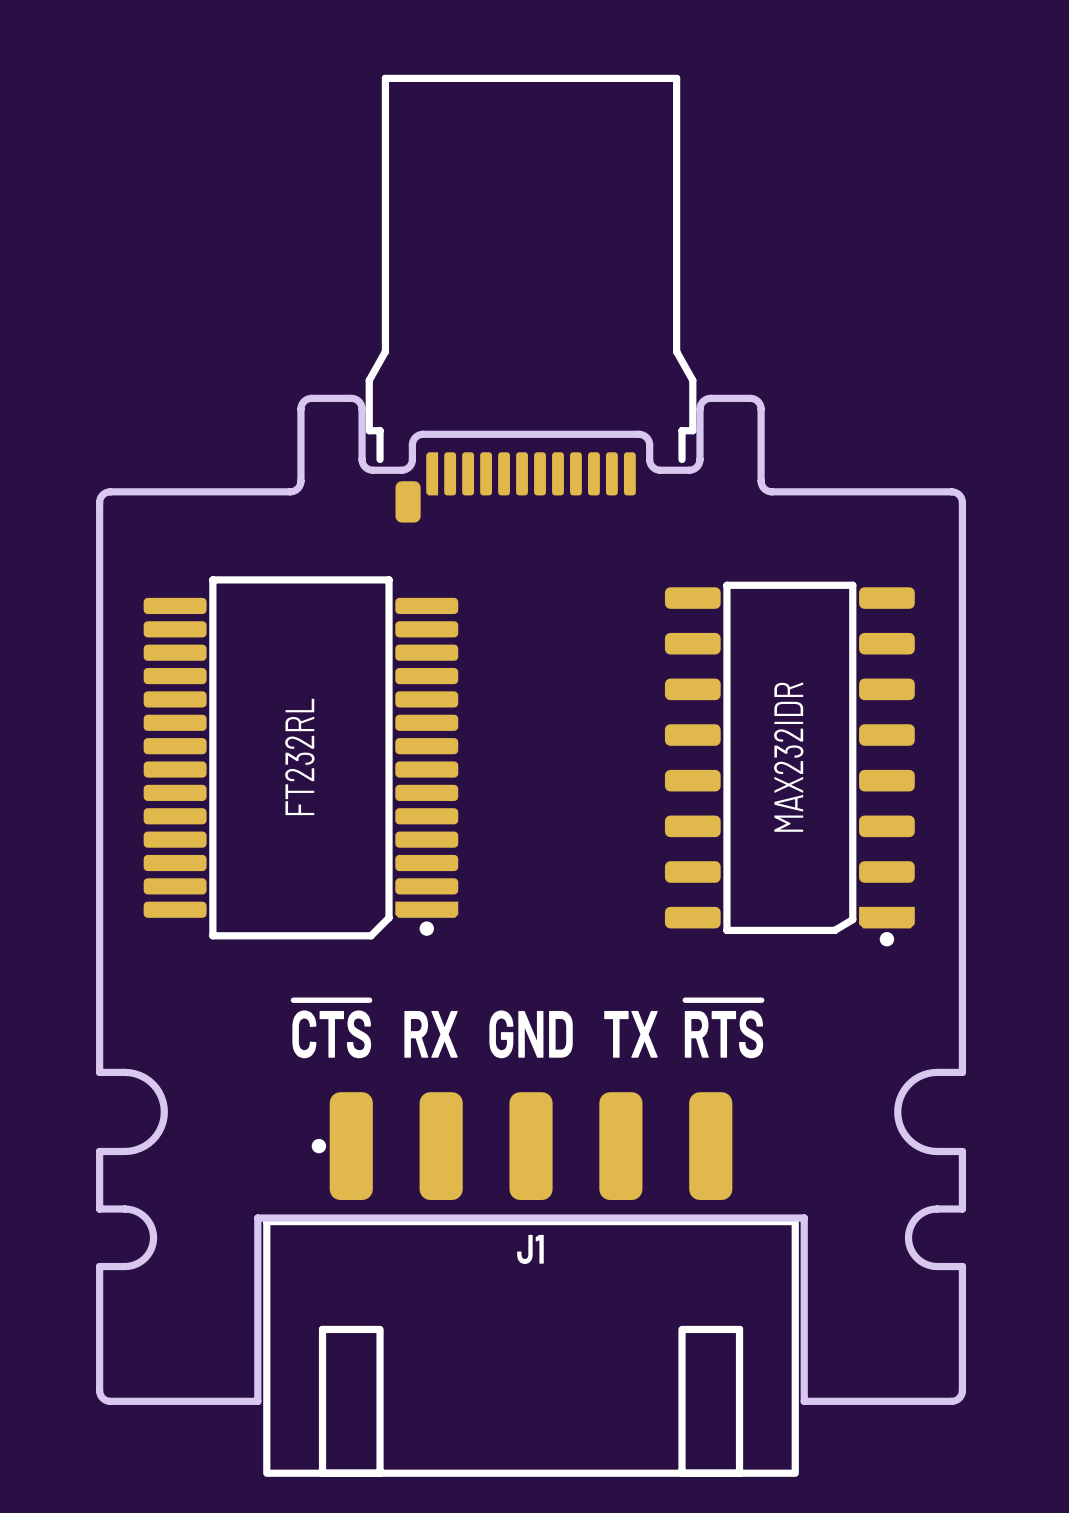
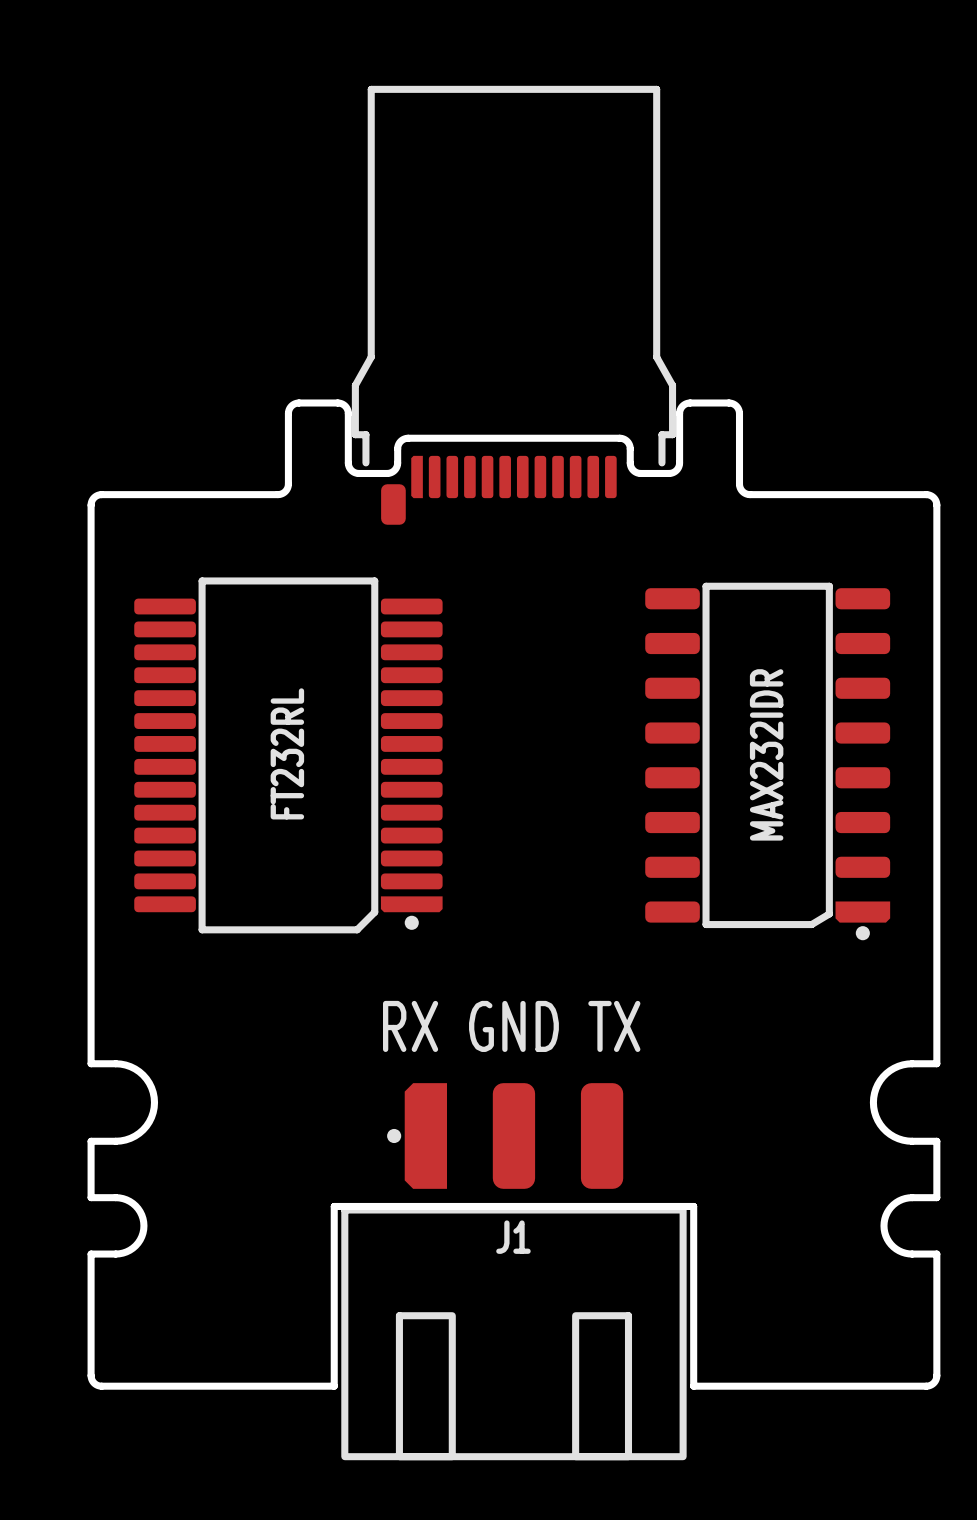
text: ~{CTS} (331, 1029) -> none
text: ~{RTS} (724, 1029) -> none
J1 footprint: [263, 1092, 799, 1477] -> [341, 1083, 687, 1461]
board edge: (347, 1218) (257, 1218) (257, 1401) -> (334, 1206) (334, 1386) (246, 1386)
board edge: (714, 1218) (804, 1218) (804, 1401) -> (693, 1206) (693, 1386) (781, 1386)

